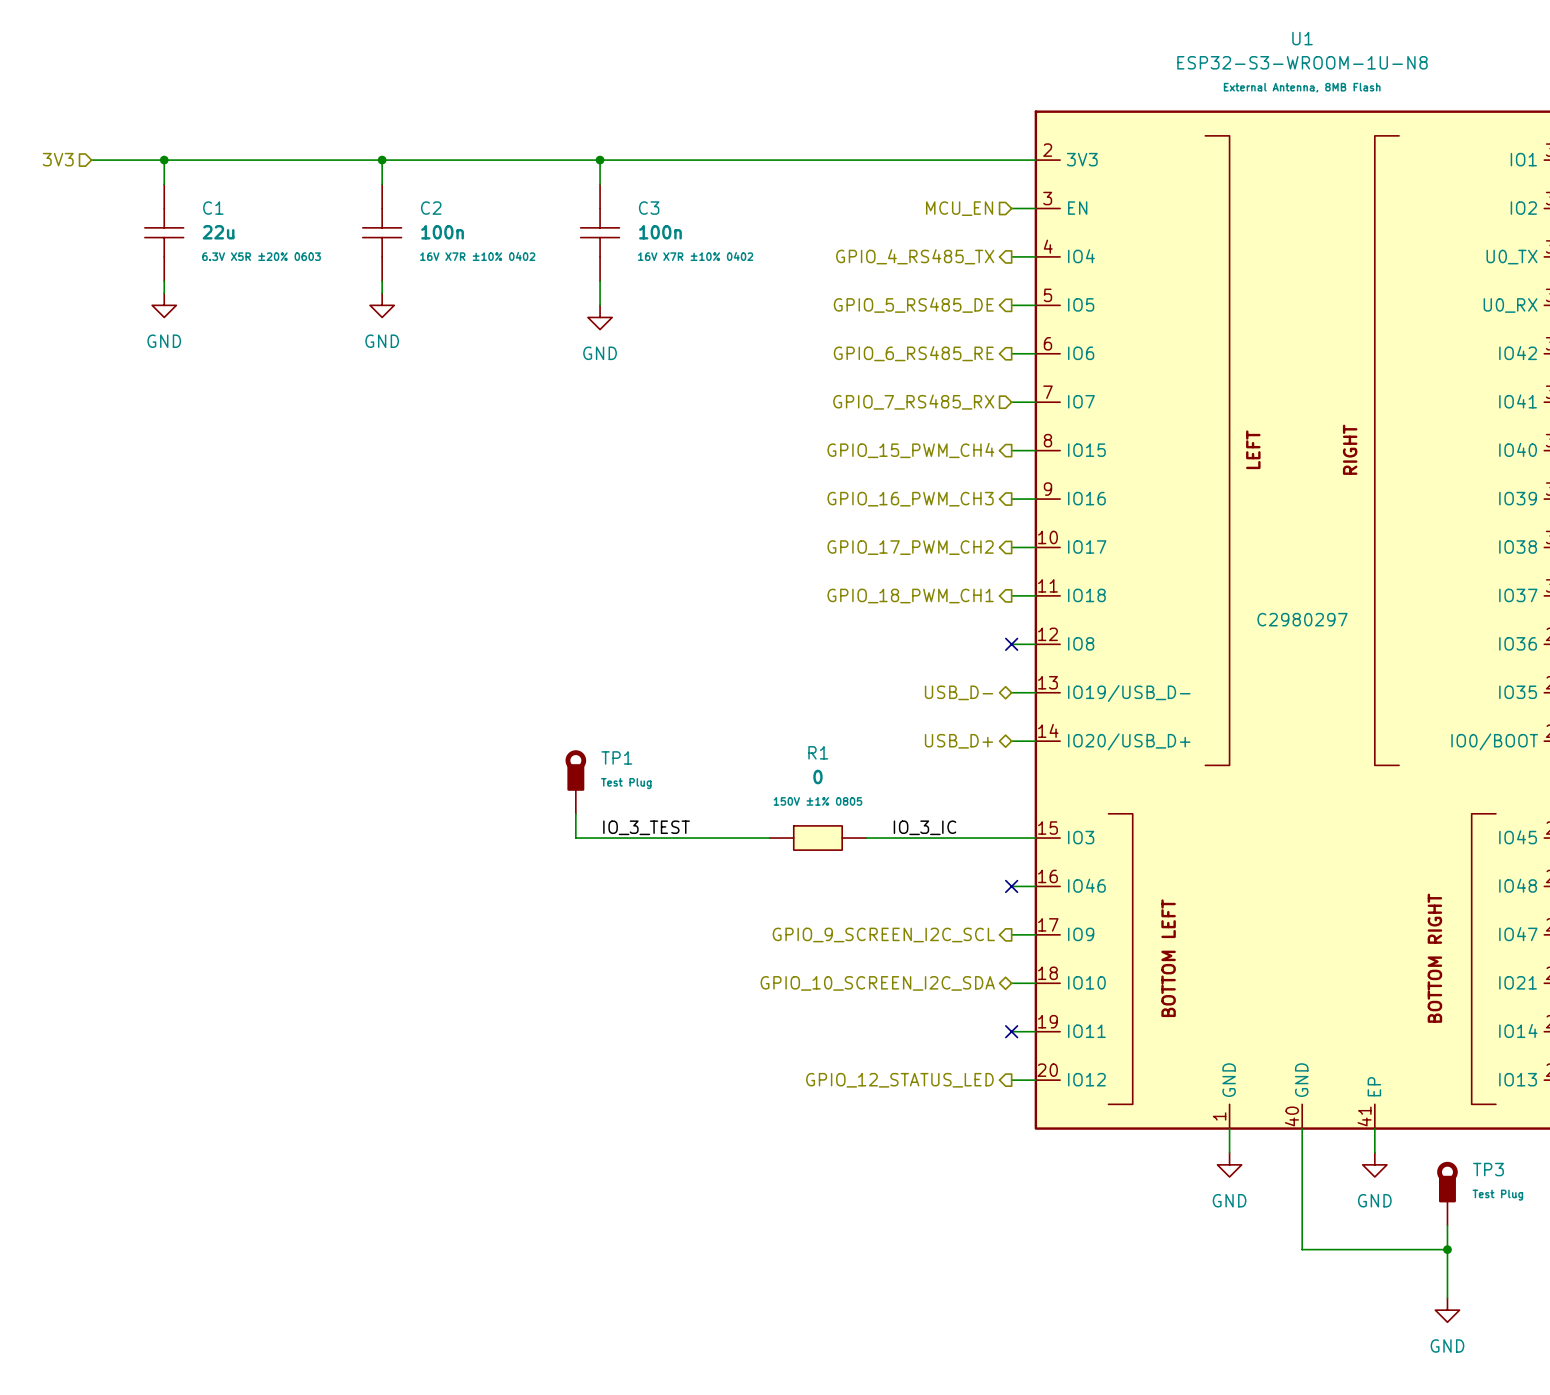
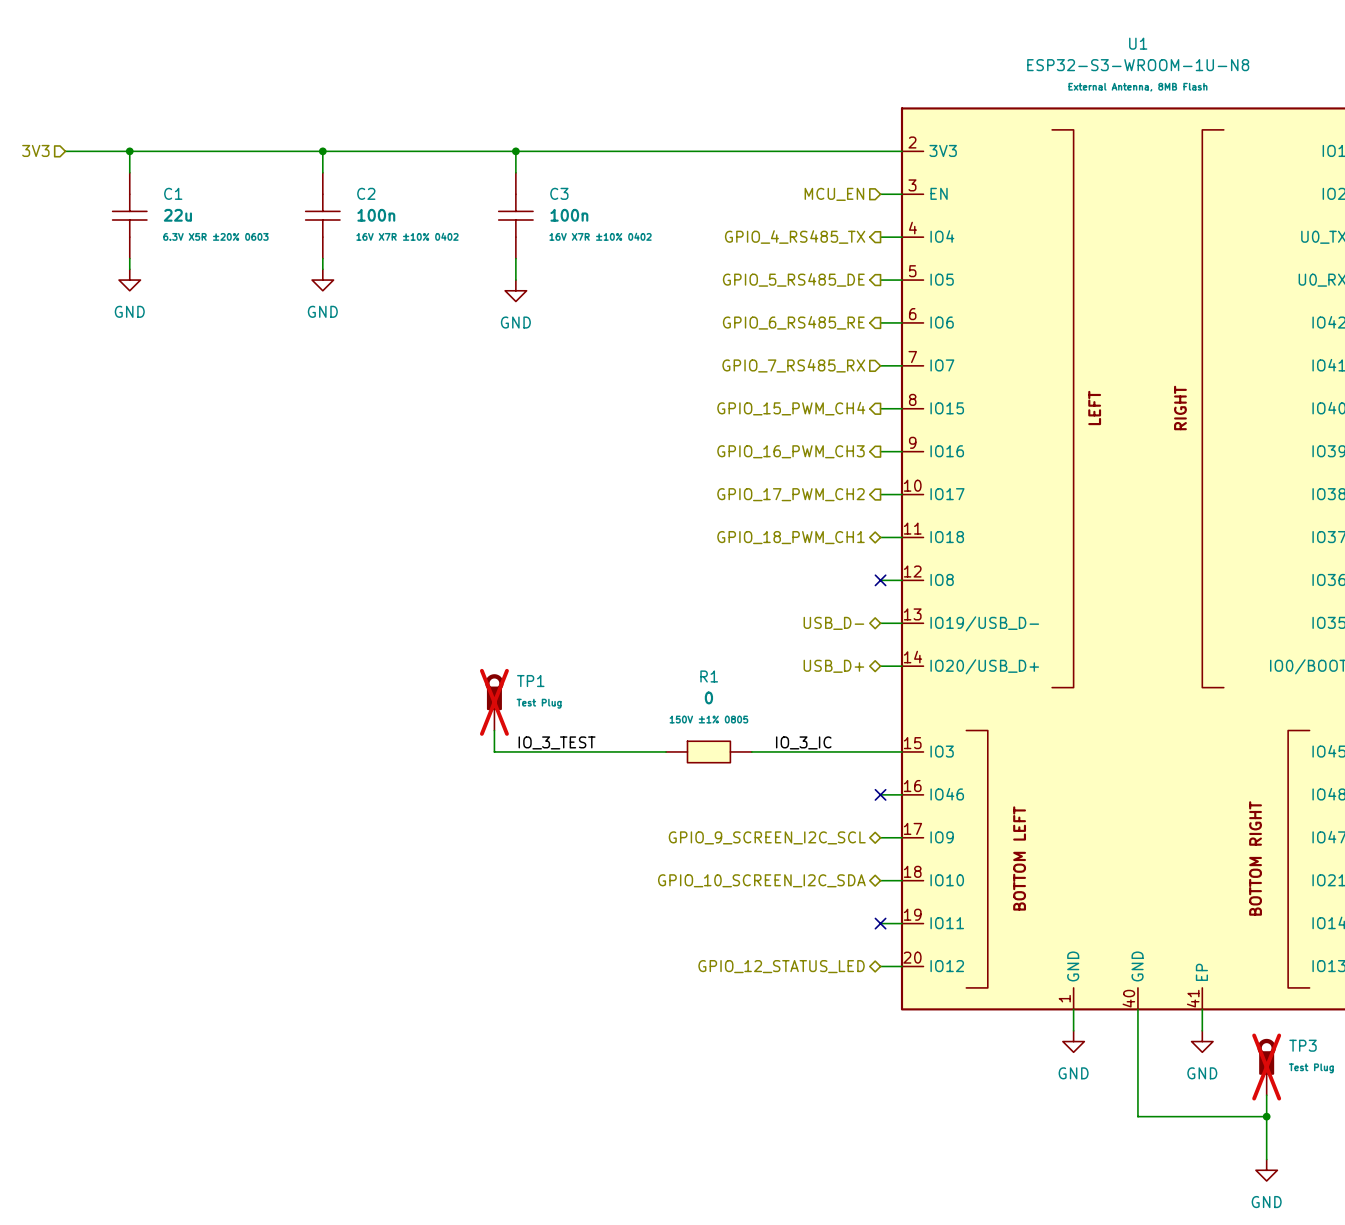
hierarchical label shape: output (910, 596) -> bidirectional (791, 537)
U1 text: C2980297 (1302, 619) -> none
TP1 do-not-place cross: none -> (494, 702)
hierarchical label shape: output (883, 934) -> bidirectional (767, 837)
hierarchical label shape: output (899, 1080) -> bidirectional (781, 966)
TP3 do-not-place cross: none -> (1266, 1067)

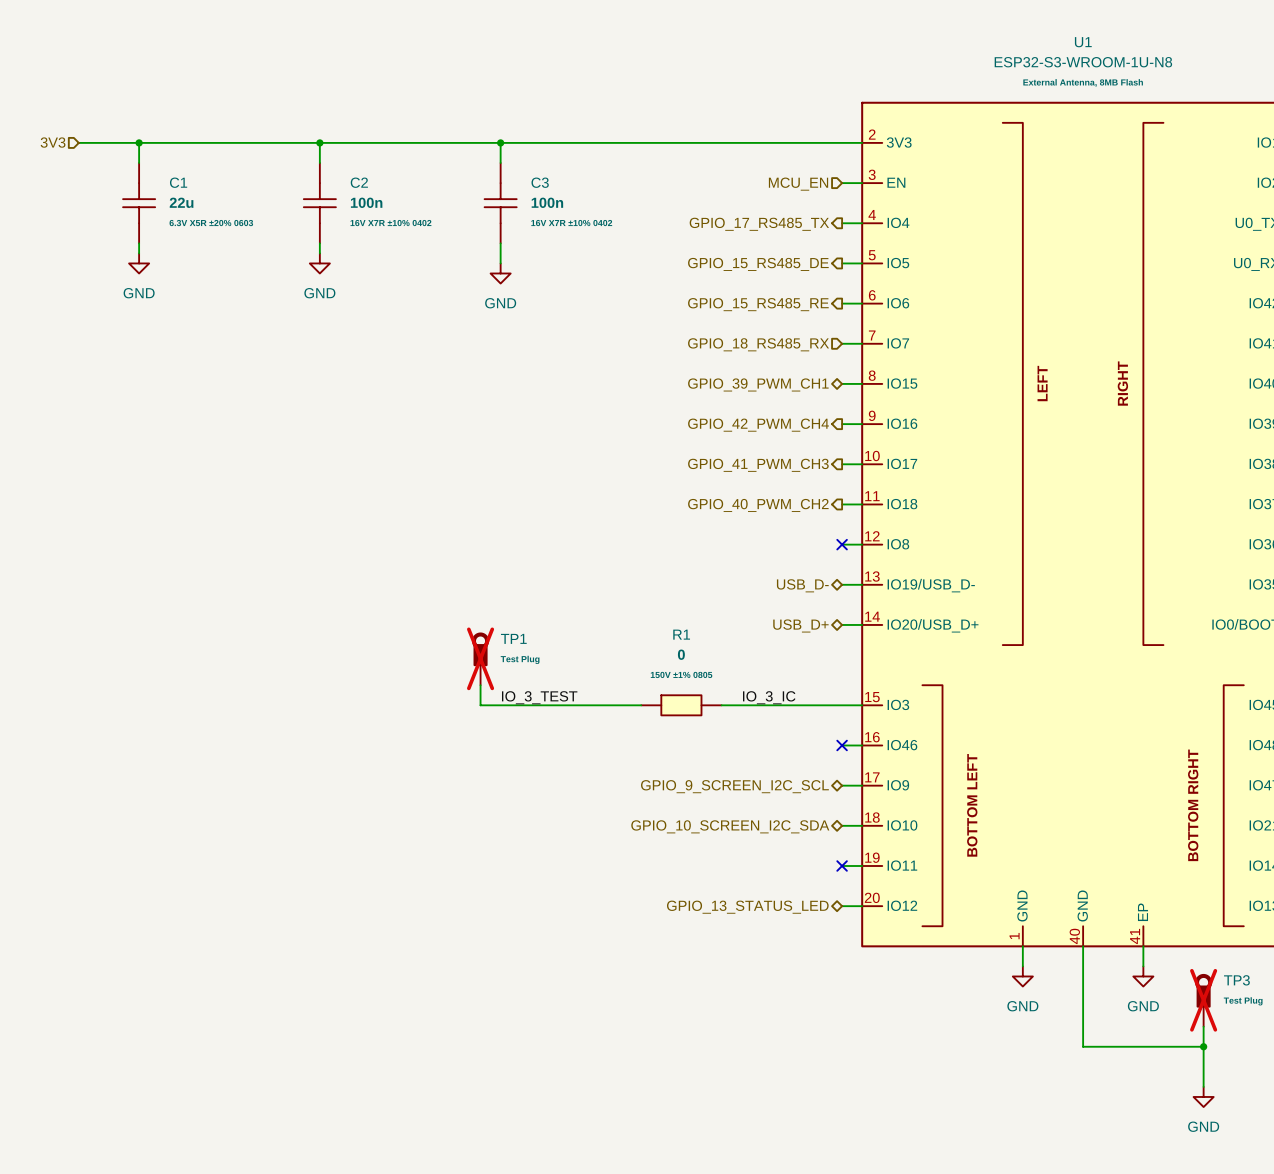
hierarchical label: GPIO_4_RS485_TX (795, 237) -> GPIO_17_RS485_TX (759, 224)
hierarchical label: GPIO_5_RS485_DE (793, 279) -> GPIO_15_RS485_DE (758, 264)
hierarchical label: GPIO_6_RS485_RE (793, 322) -> GPIO_15_RS485_RE (758, 304)
hierarchical label: GPIO_7_RS485_RX (793, 365) -> GPIO_18_RS485_RX (758, 344)
hierarchical label shape: output (791, 408) -> bidirectional (758, 384)
hierarchical label: GPIO_15_PWM_CH4 (791, 408) -> GPIO_39_PWM_CH1 (758, 384)
hierarchical label: GPIO_16_PWM_CH3 (791, 451) -> GPIO_42_PWM_CH4 (758, 425)
hierarchical label: GPIO_17_PWM_CH2 (791, 494) -> GPIO_41_PWM_CH3 (758, 465)
hierarchical label shape: bidirectional (791, 537) -> output (758, 505)
hierarchical label: GPIO_18_PWM_CH1 (791, 537) -> GPIO_40_PWM_CH2 (758, 505)
hierarchical label: GPIO_12_STATUS_LED (781, 966) -> GPIO_13_STATUS_LED (747, 907)

